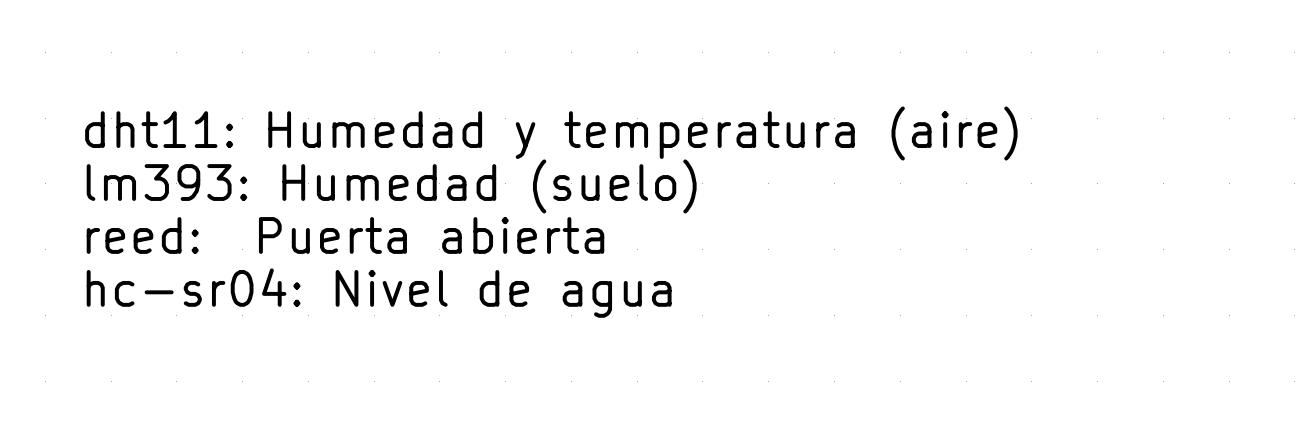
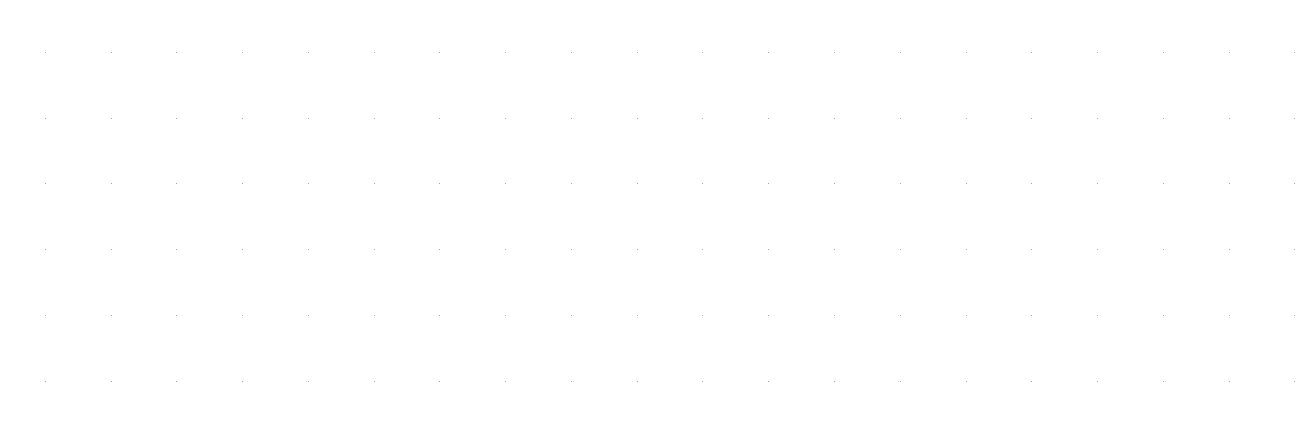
text: dht11: Humedad y temperatura (aire) (551, 133) -> none
text: lm393: Humedad (suelo) (391, 186) -> none
text: reed: Puerta abierta (345, 235) -> none
text: hc-sr04: Nivel de agua (379, 293) -> none

